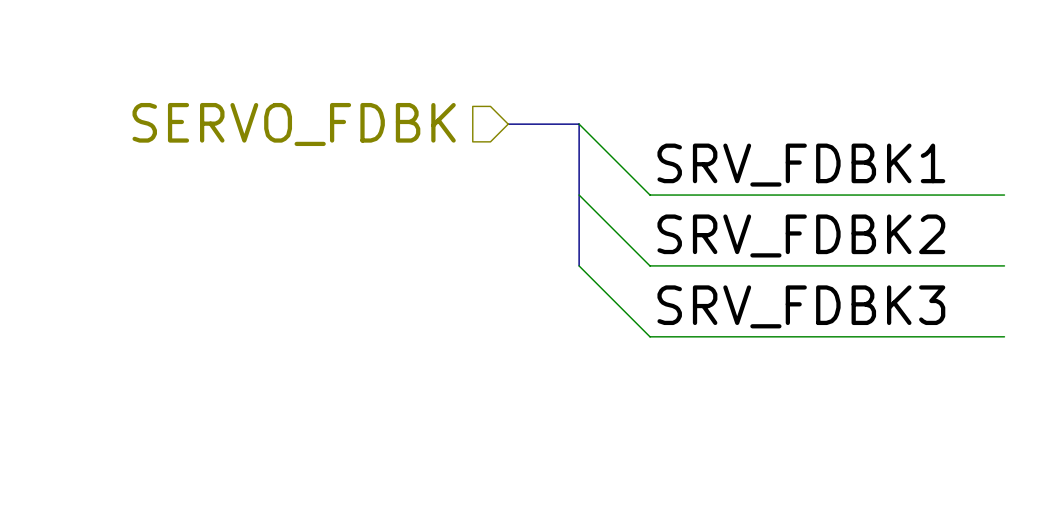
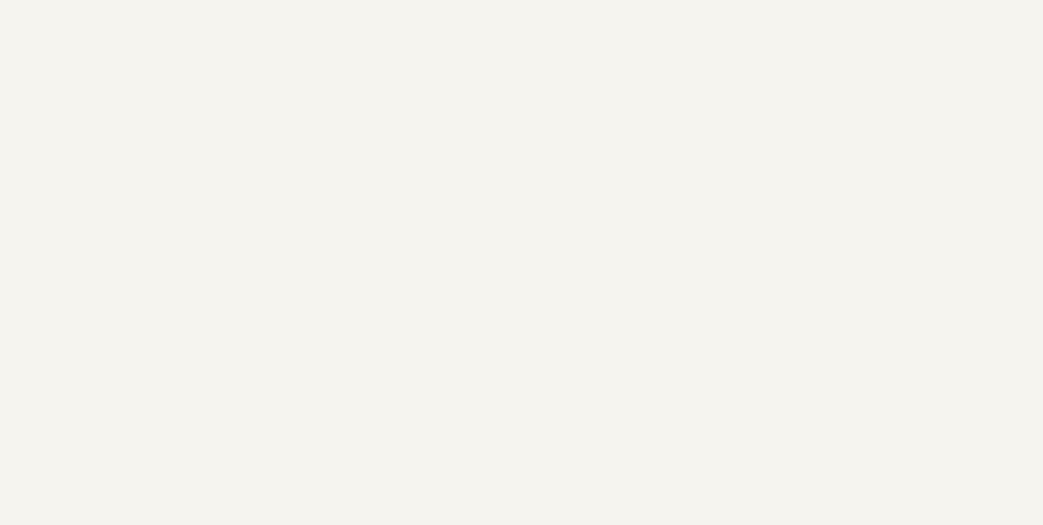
hierarchical label: SERVO_FDBK (294, 124) -> none
bus: (508, 124) (579, 124) (579, 265) -> none
wire: (579, 124) (650, 195) (1004, 195) -> none
label: SRV_FDBK1 (801, 165) -> none
wire: (579, 195) (650, 265) (1004, 265) -> none
label: SRV_FDBK2 (801, 235) -> none
wire: (579, 265) (650, 336) (1004, 336) -> none
label: SRV_FDBK3 (801, 306) -> none

